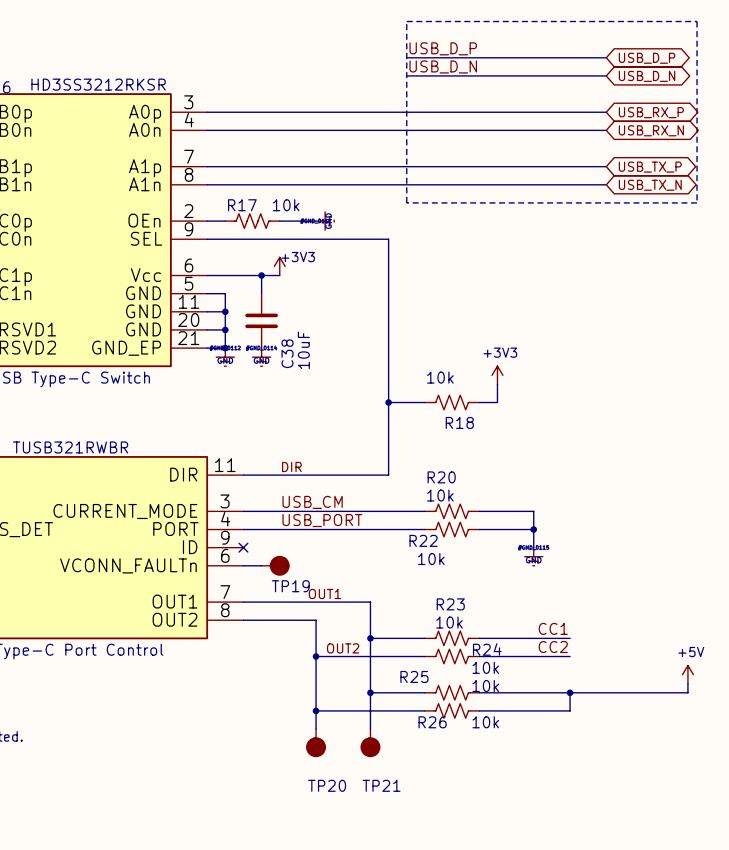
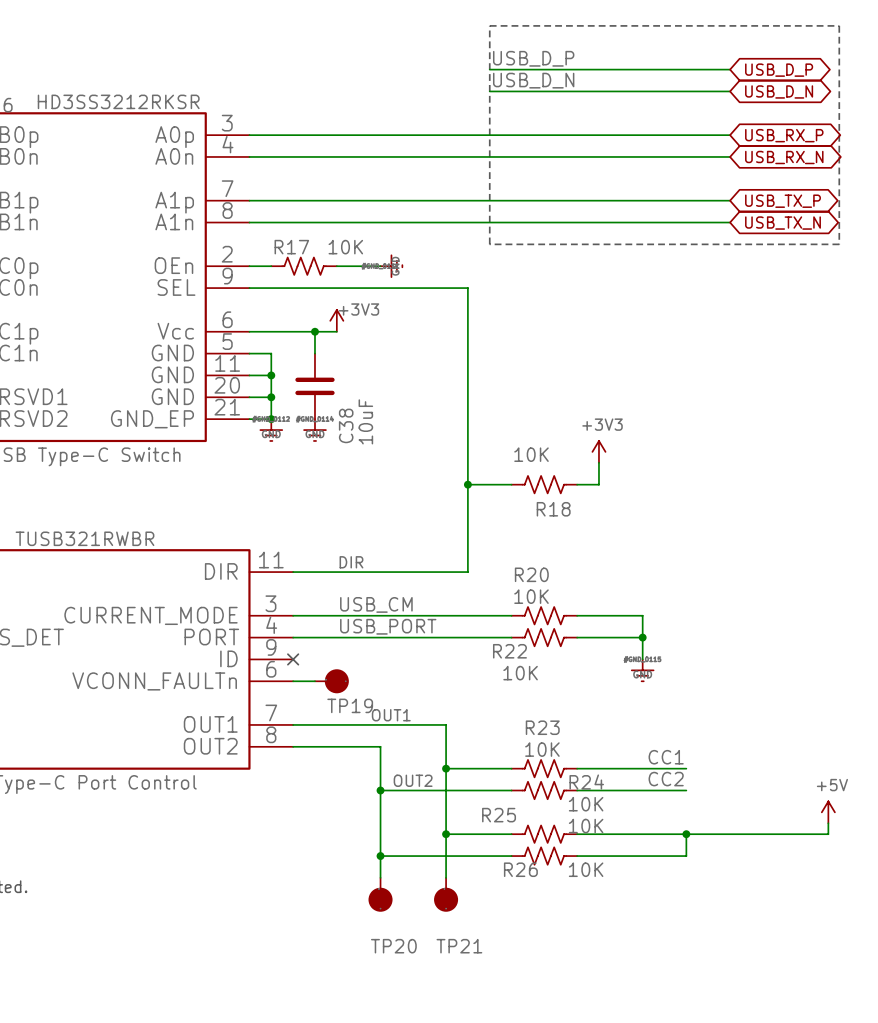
R17 value: 10k (286, 205) -> 10K (345, 247)
R18 value: 10k (440, 377) -> 10K (531, 454)
R20 value: 10k (440, 495) -> 10K (531, 596)
R22 value: 10k (431, 559) -> 10K (520, 673)
R23 value: 10k (449, 622) -> 10K (542, 749)
R24 value: 10k (485, 667) -> 10K (586, 804)
R25 value: 10k (485, 686) -> 10K (586, 826)
R26 value: 10k (485, 722) -> 10K (586, 869)

